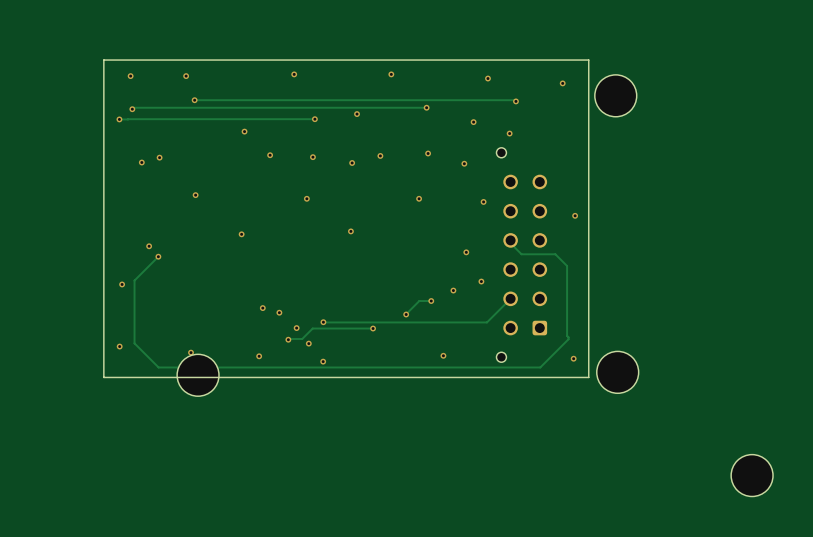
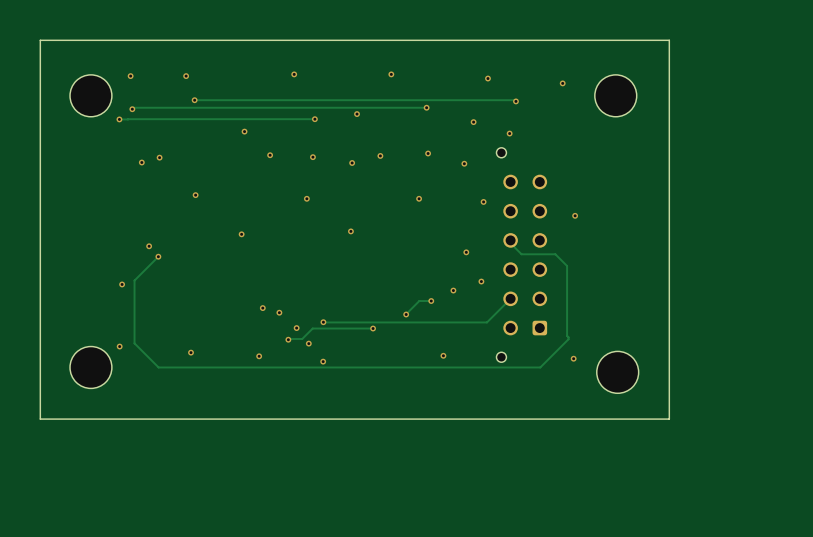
board edge: (588, 60) (103, 60) (103, 377) (588, 377) (588, 60) -> (669, 40) (669, 419) (40, 419) (40, 40) (669, 40)
part: none -> (90, 95)
part position: (198, 375) -> (90, 367)
part: (752, 475) -> none

